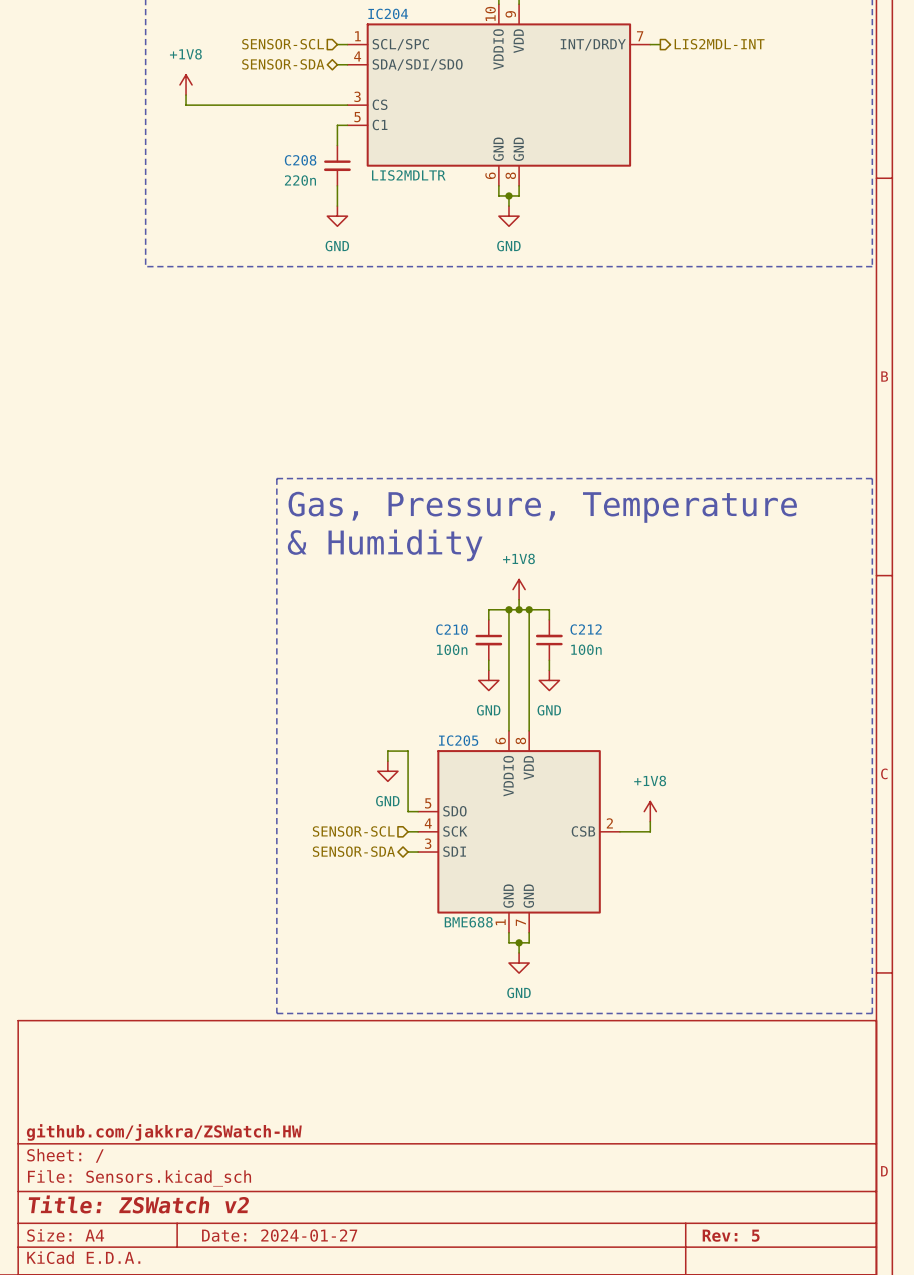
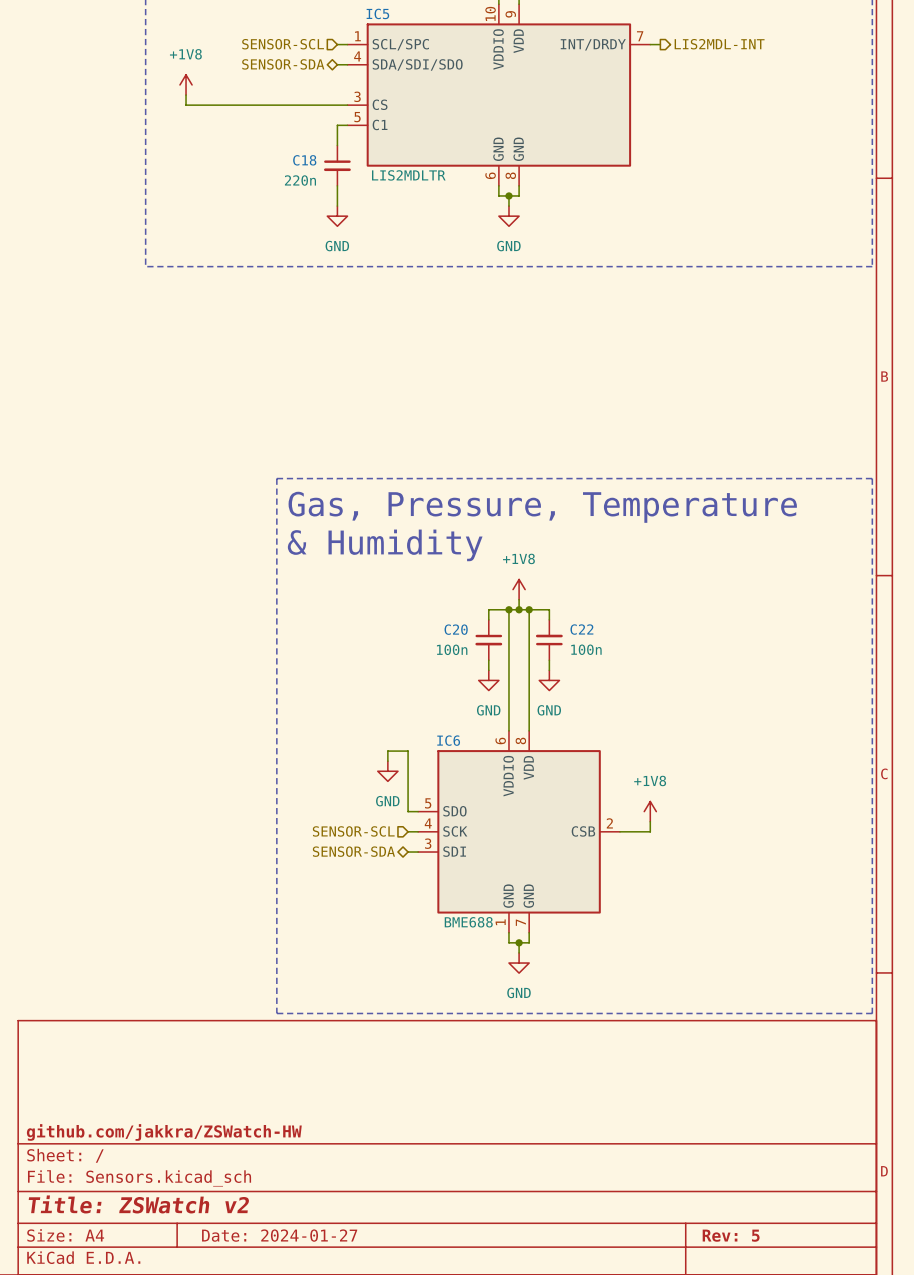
IC204 name: IC204 (388, 13) -> IC5 (377, 13)
C208 name: C208 (300, 160) -> C18 (304, 160)
C210 name: C210 (451, 629) -> C20 (456, 629)
C212 name: C212 (586, 629) -> C22 (581, 629)
IC205 name: IC205 (458, 740) -> IC6 (448, 740)

